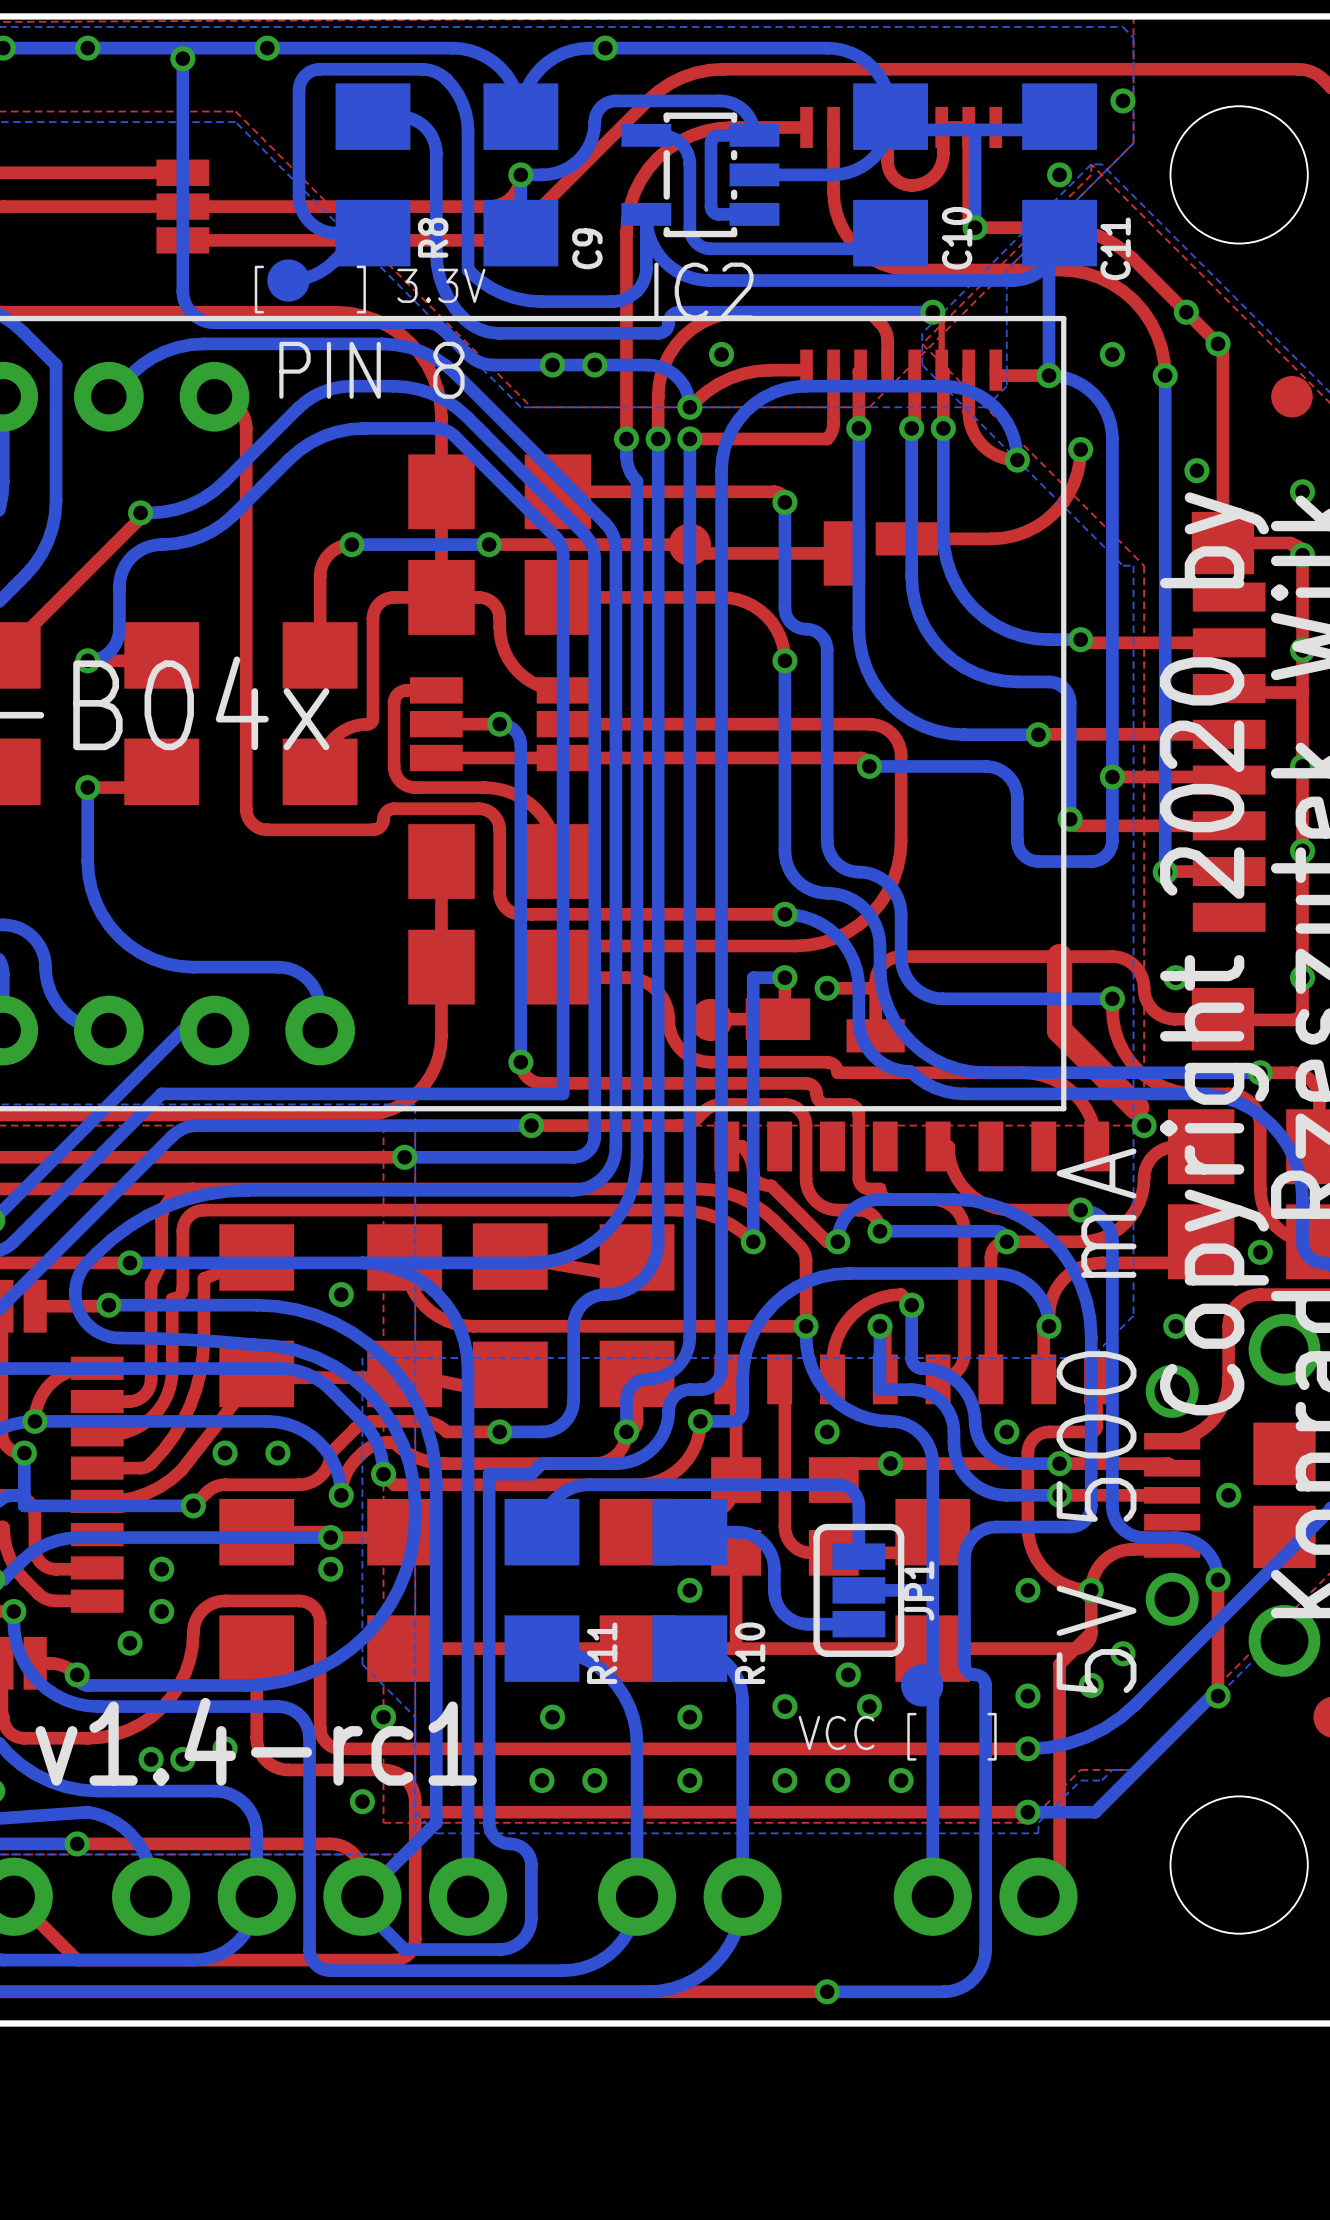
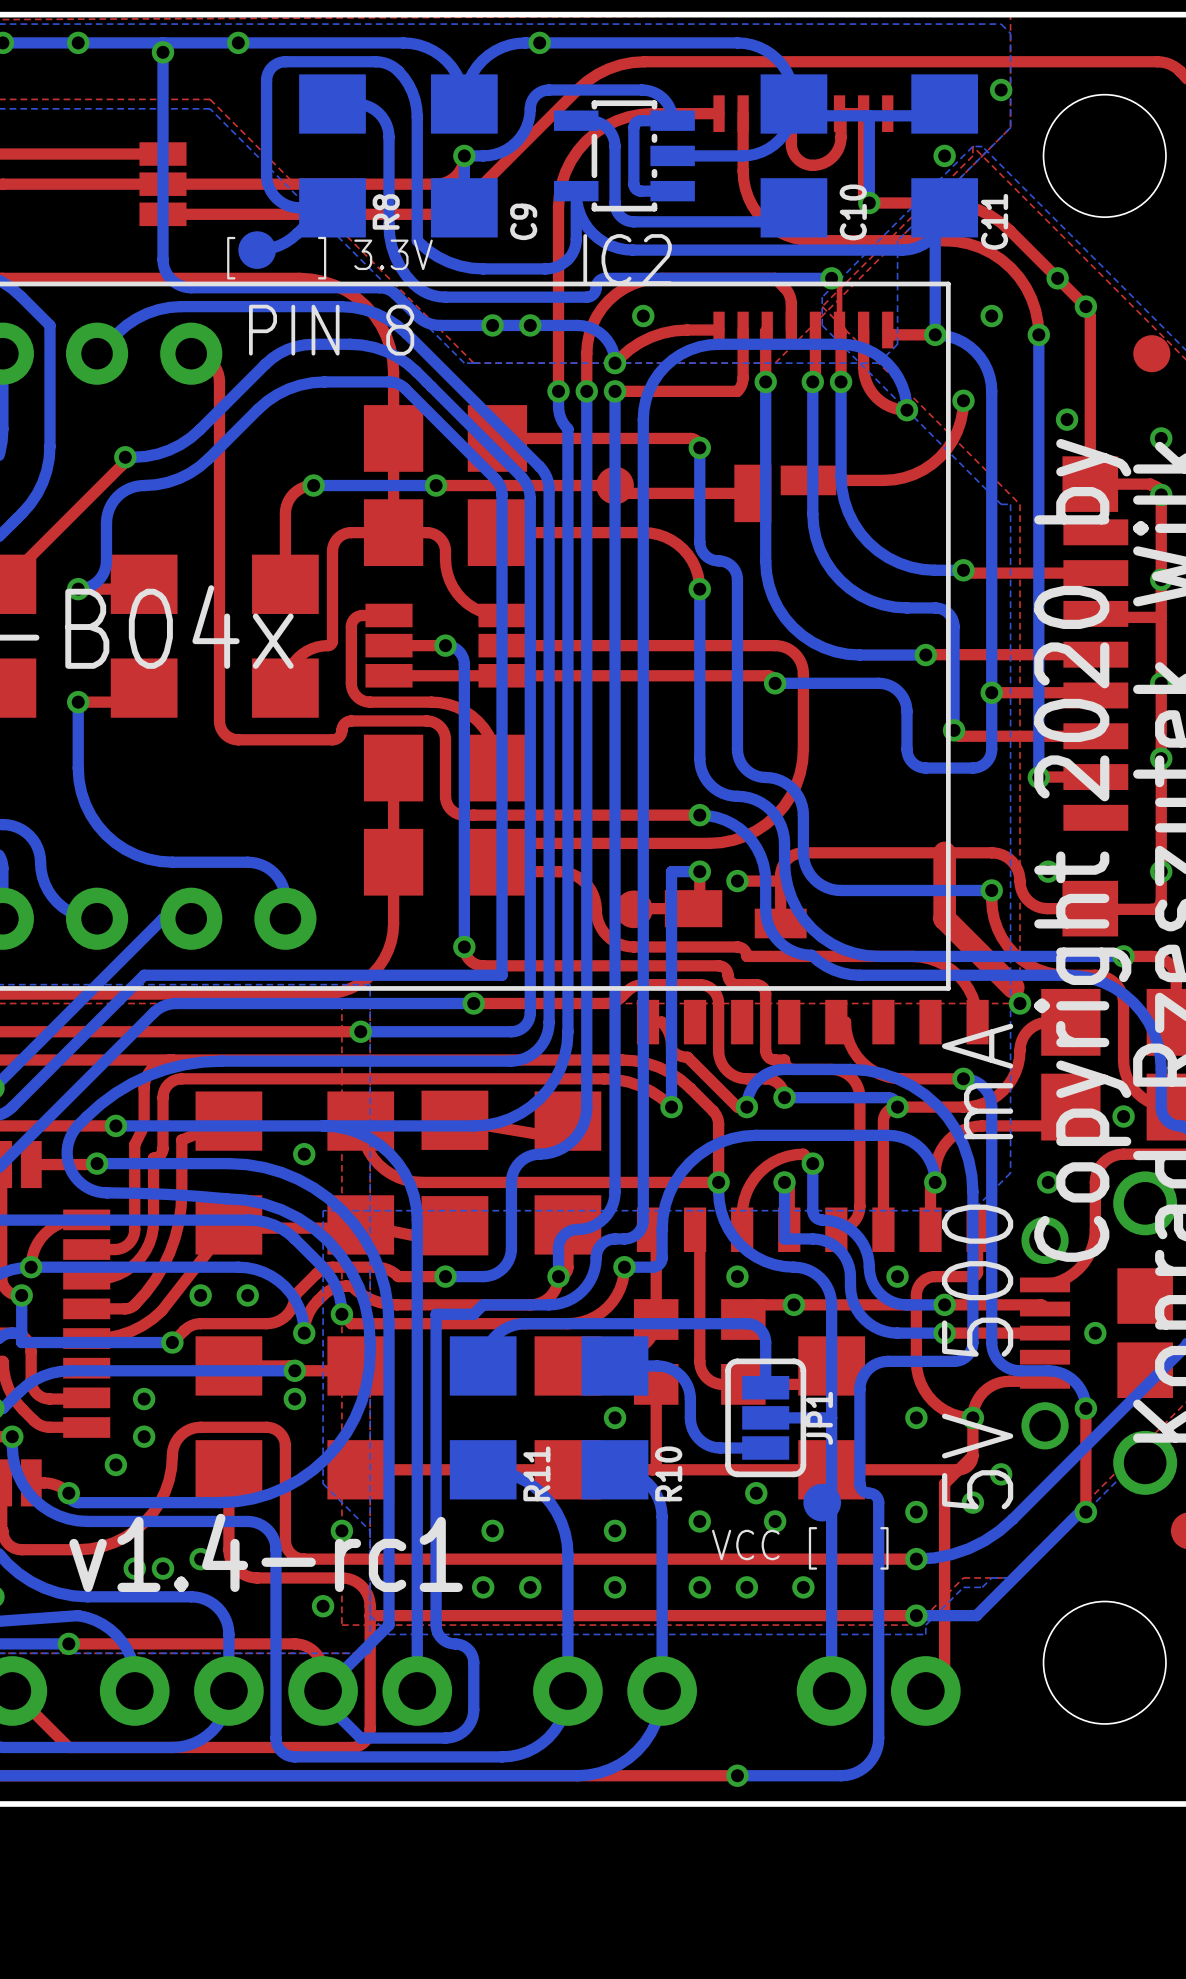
text position: v1.4-rc1 (256, 1741) -> v1.4-rc1 (266, 1552)

